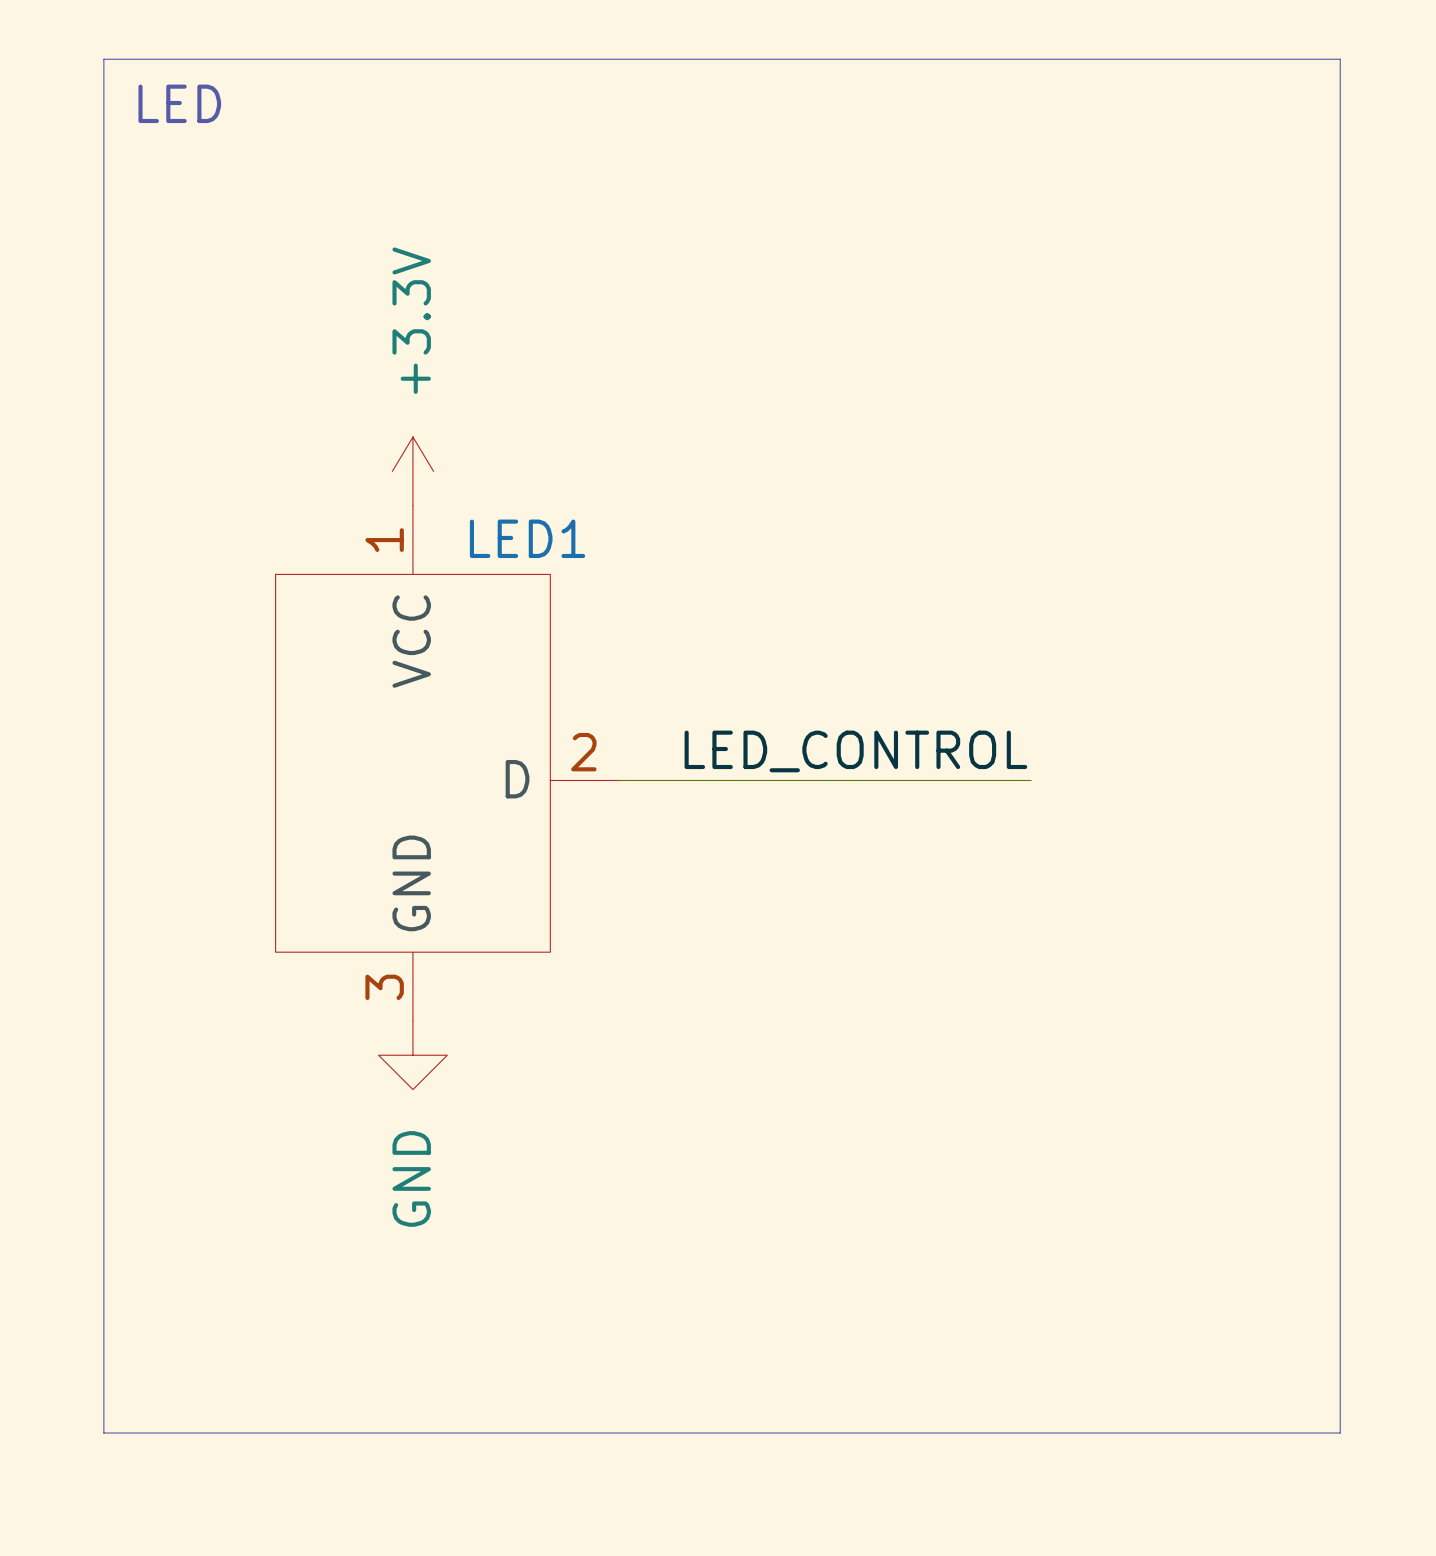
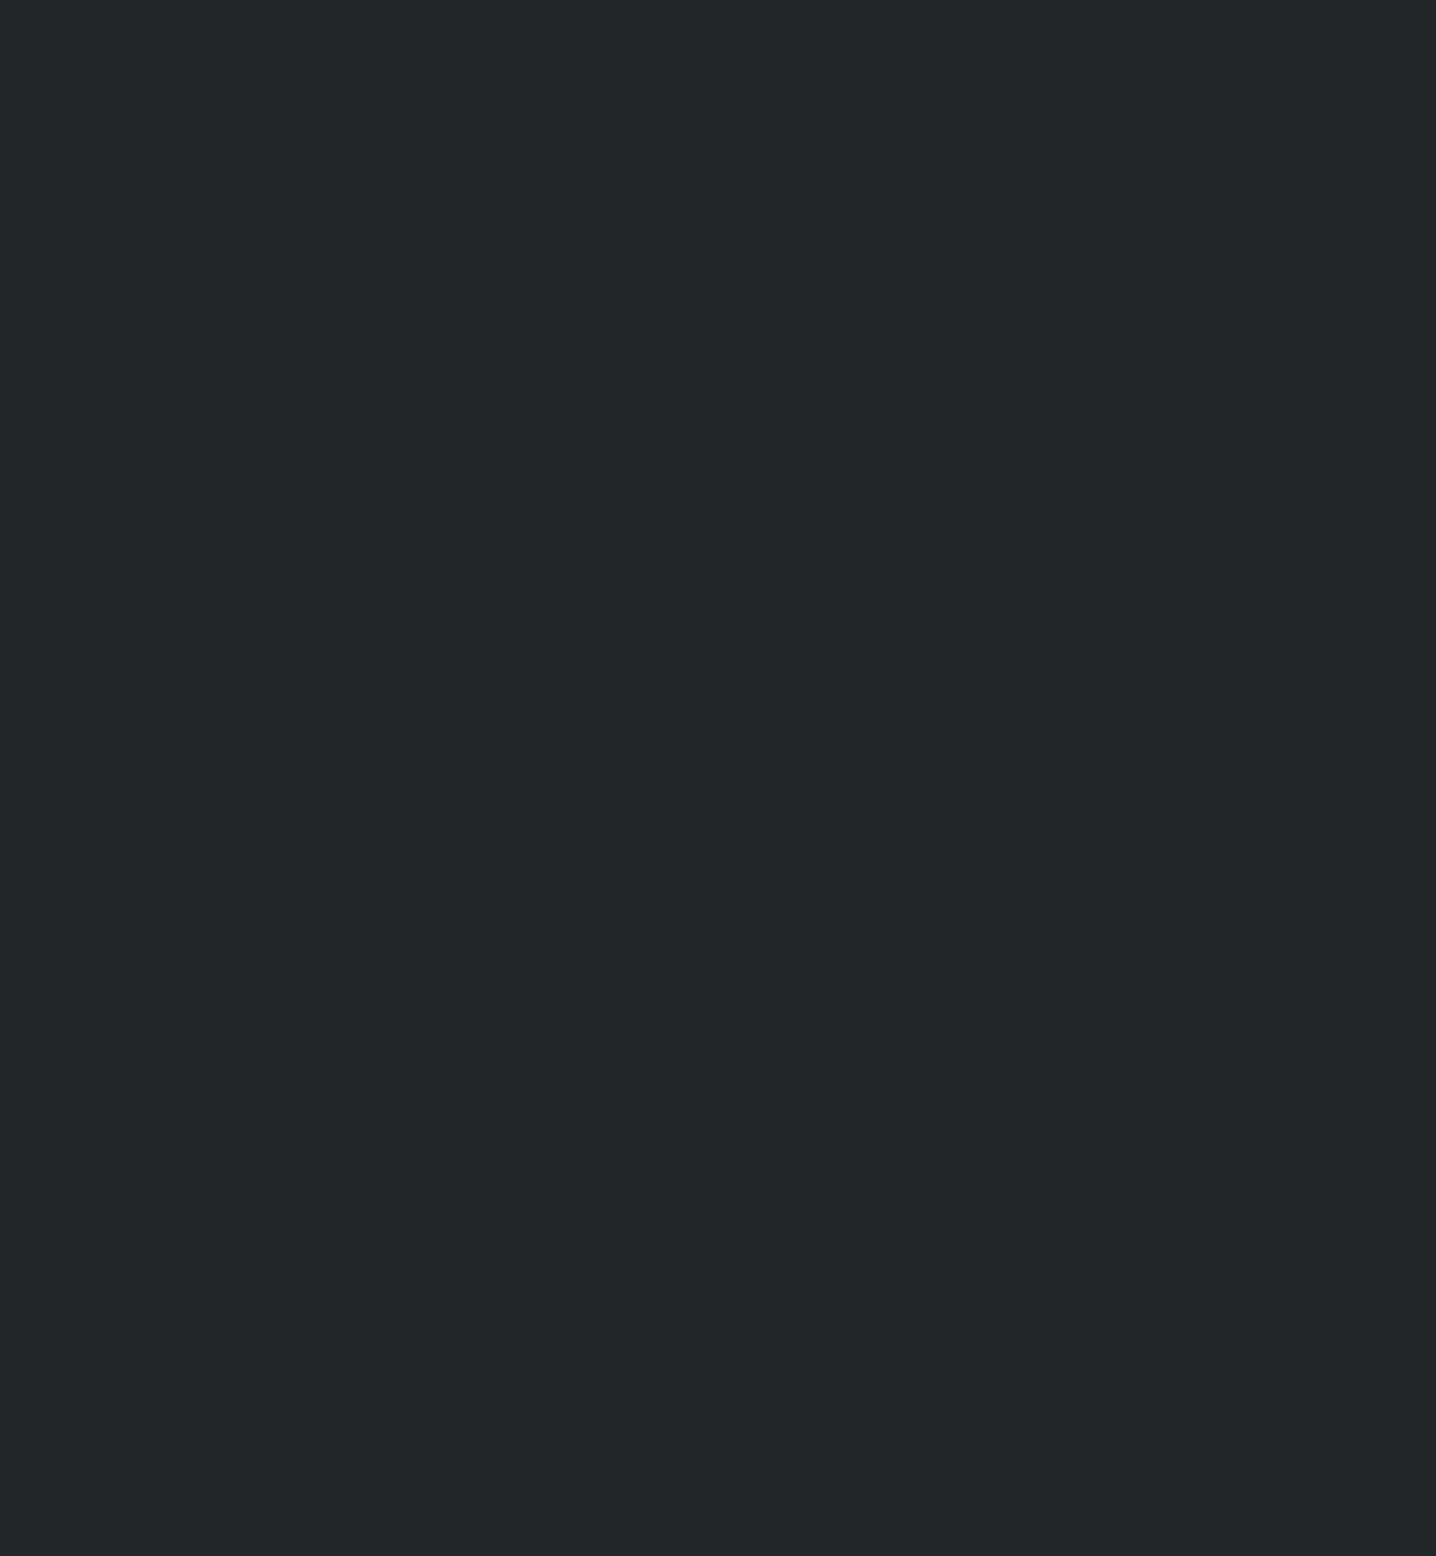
line: (103, 59) (1340, 59) (1340, 1433) (103, 1433) (103, 59) -> none
text: LED (179, 103) -> none
power symbol: +3.3V (412, 471) -> none
label: LED_CONTROL (855, 751) -> none
LED1: (447, 763) -> none
wire: (619, 780) (1031, 780) -> none
power symbol: GND (412, 1055) -> none

